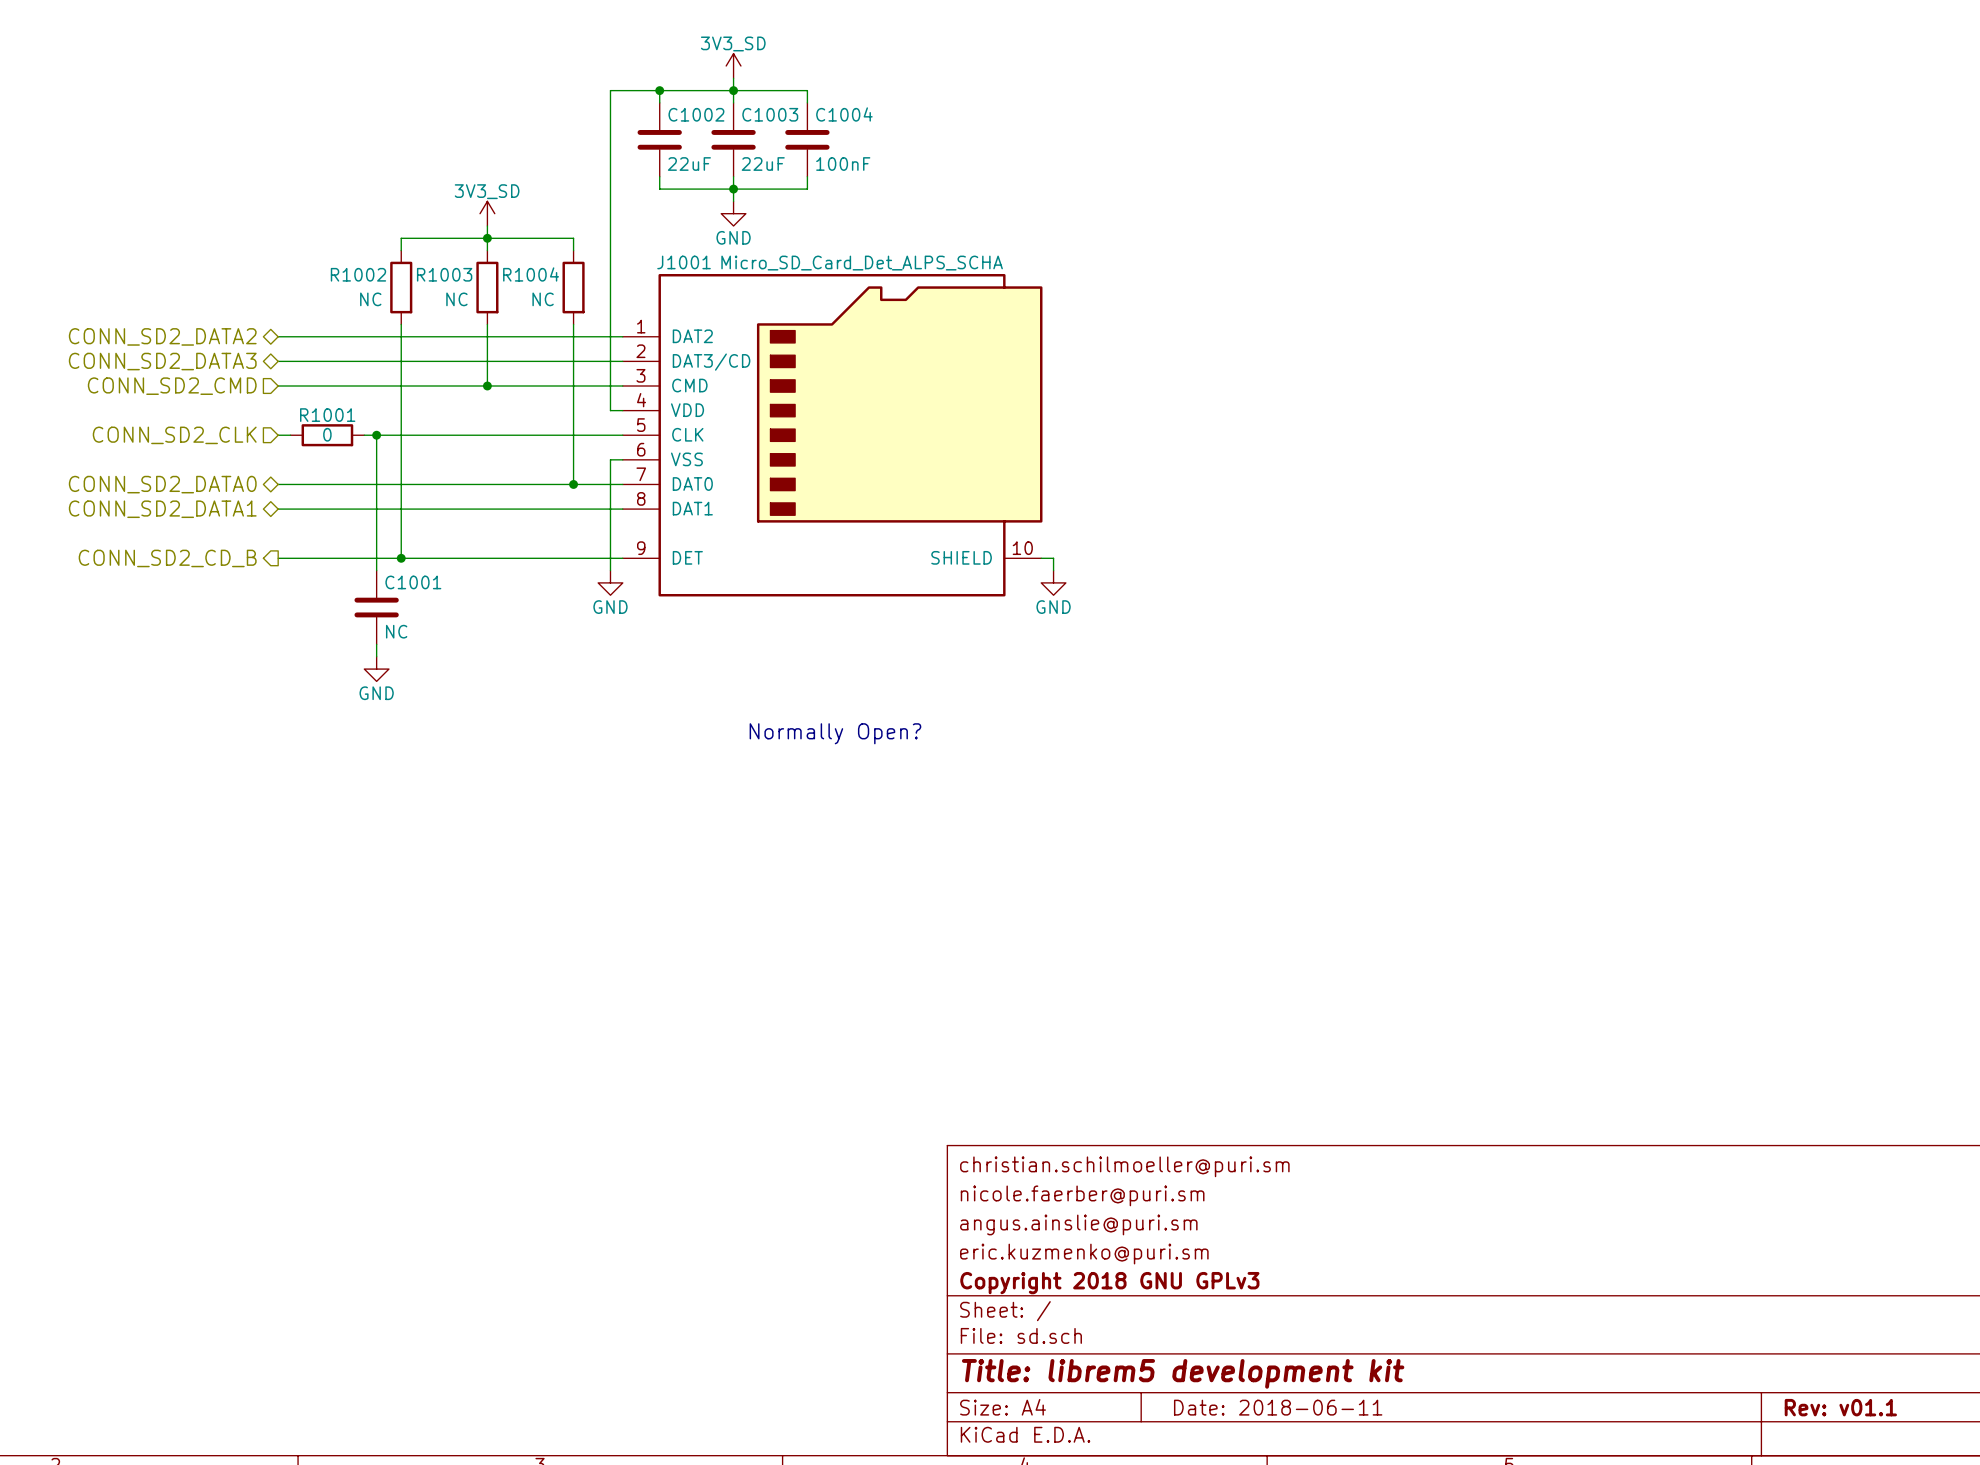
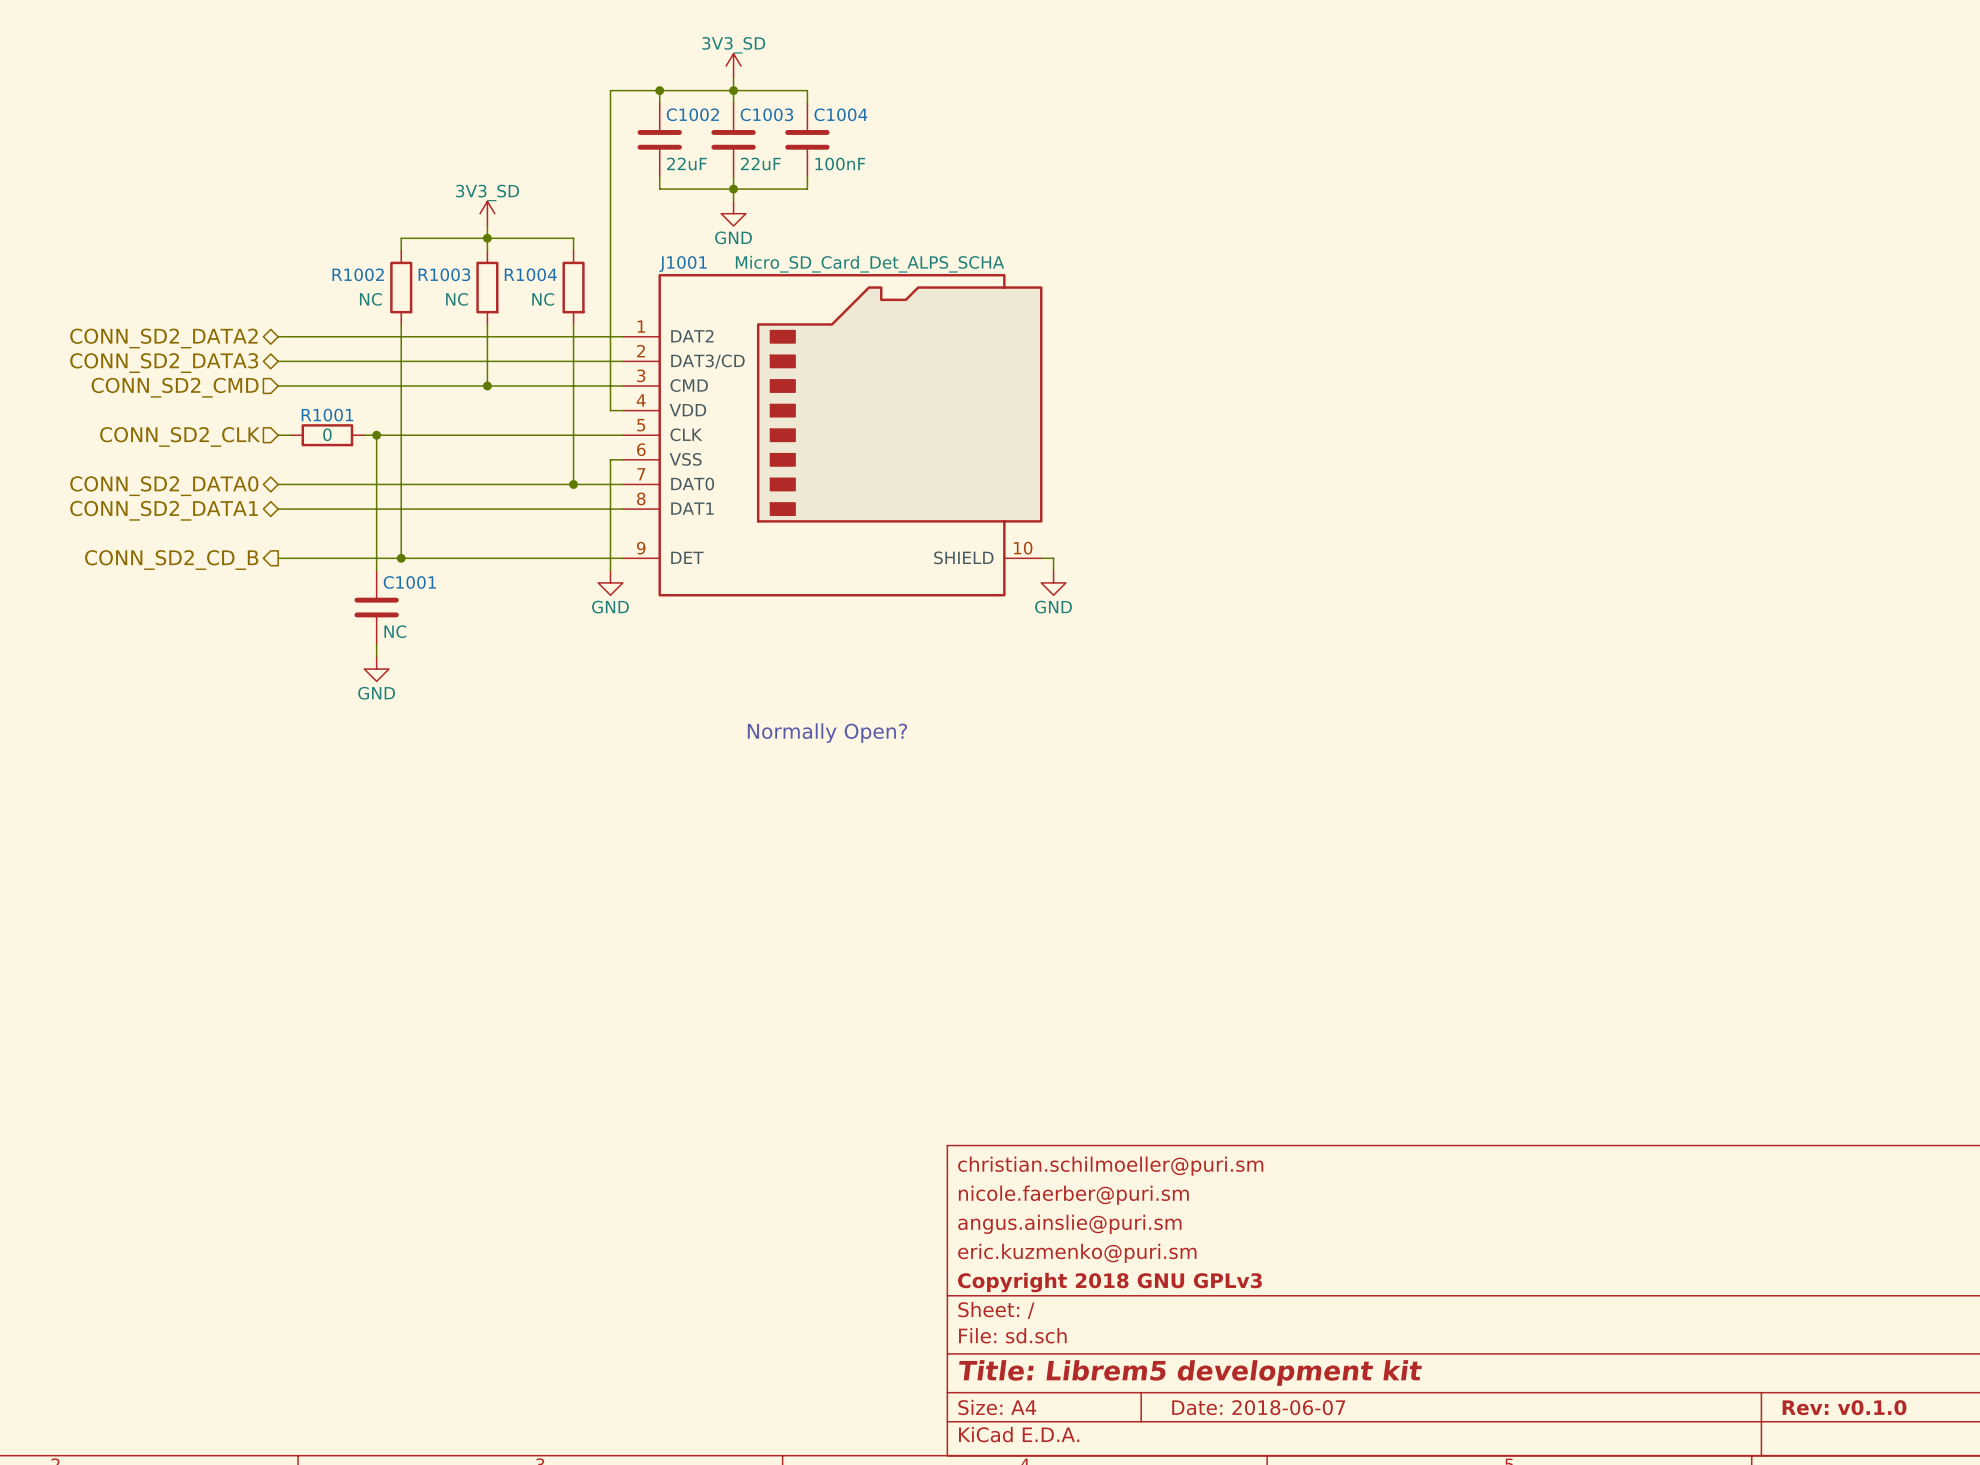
title block: Title: librem5 development kit (1183, 1373) -> Title: Librem5 development kit (1190, 1372)
title block: Date: 2018-06-11 (1278, 1407) -> Date: 2018-06-07 (1258, 1407)
title block: Rev: v01.1 (1840, 1407) -> Rev: v0.1.0 (1844, 1407)

